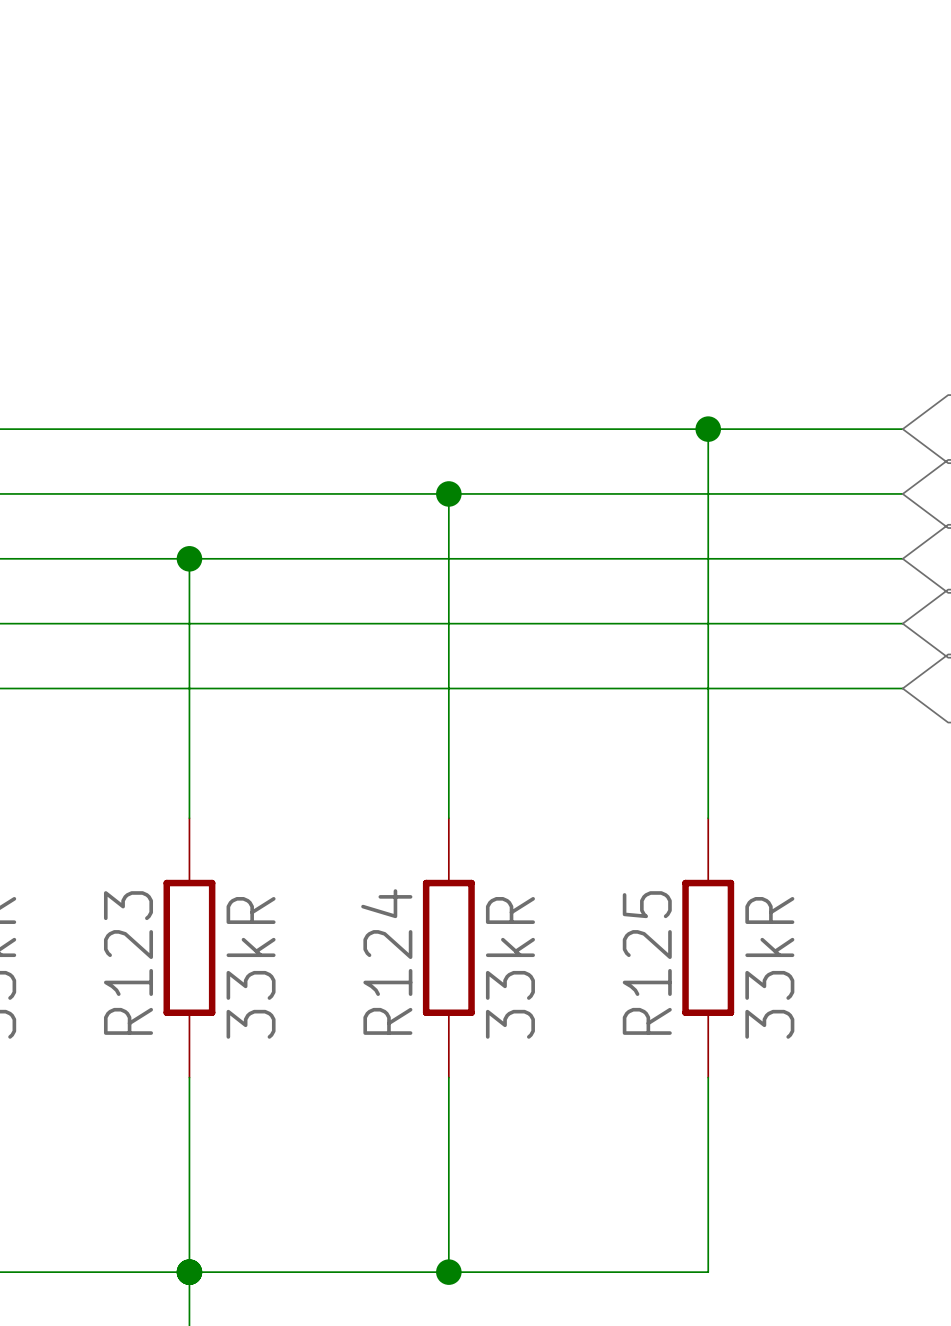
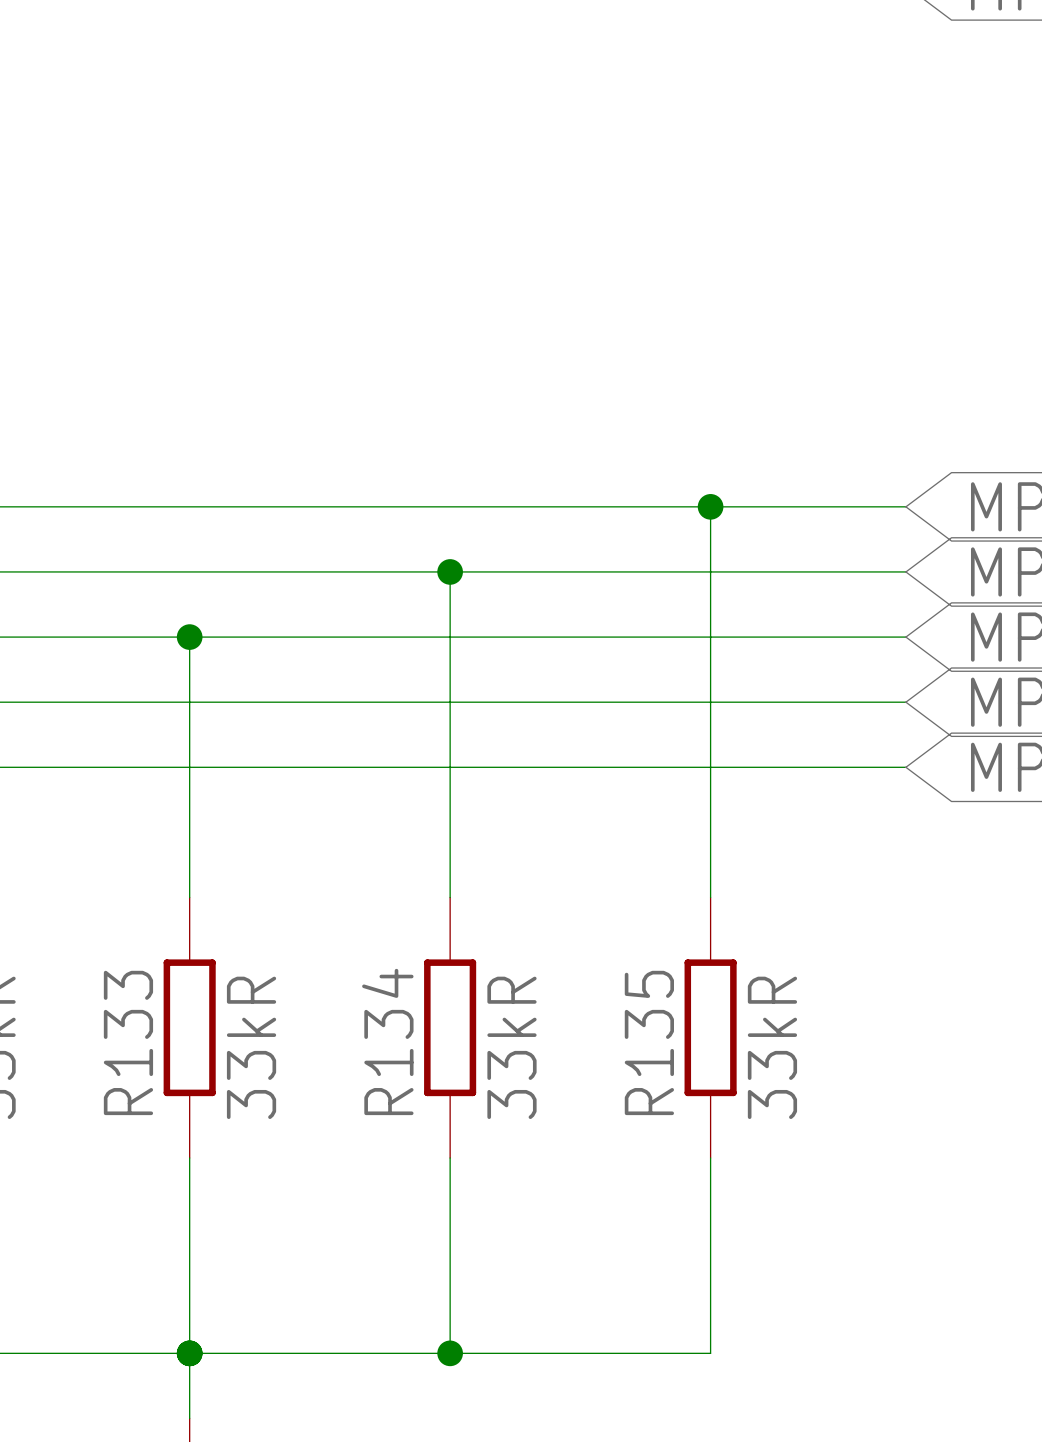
R124 name: R124 (386, 962) -> R134 (387, 1041)
R123 name: R123 (128, 963) -> R133 (128, 1042)
R125 name: R125 (647, 963) -> R135 (649, 1042)

